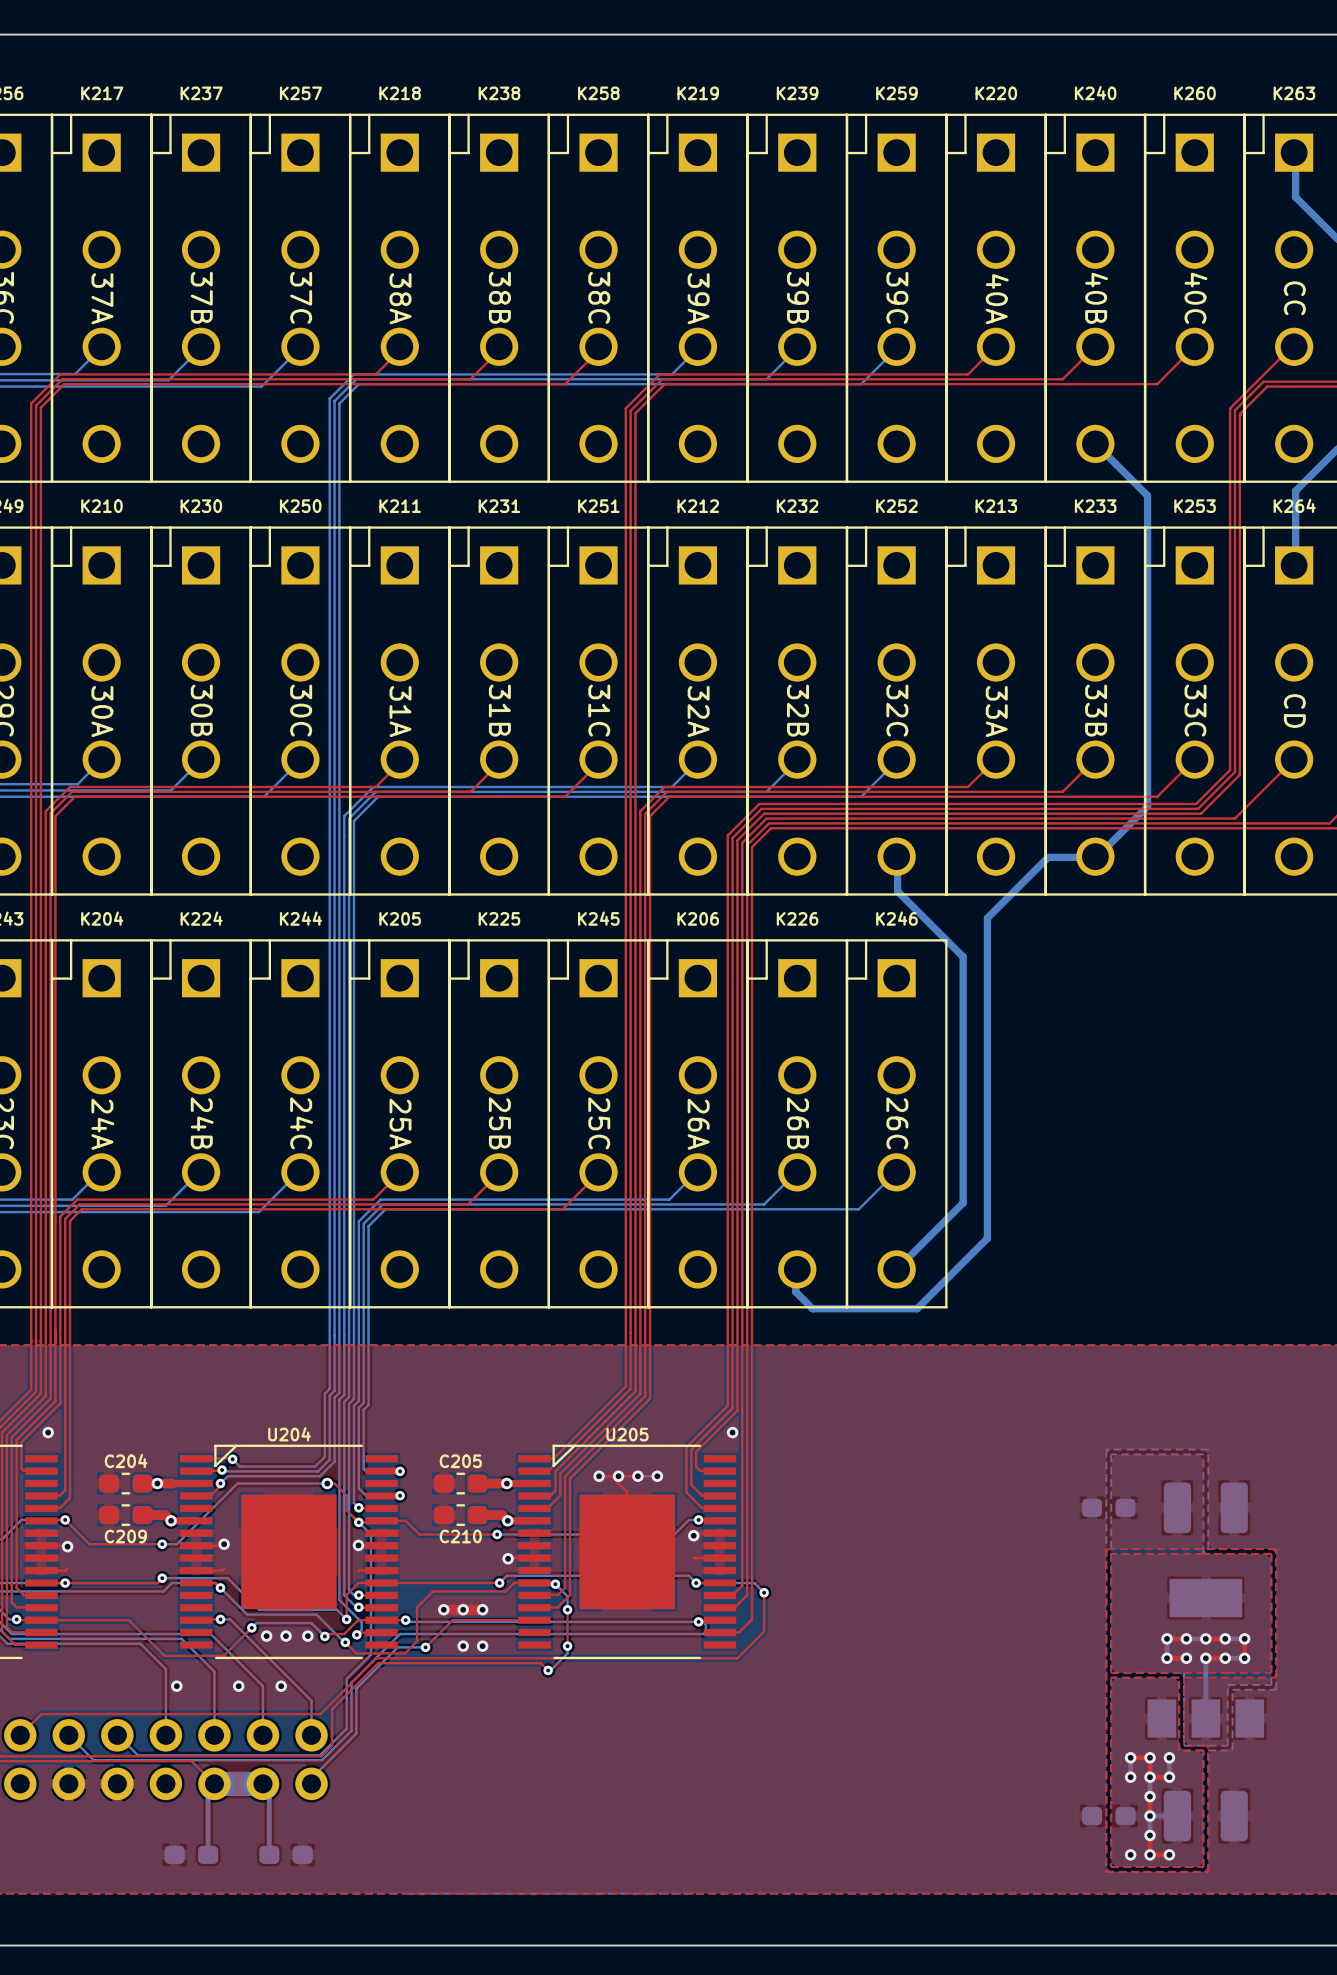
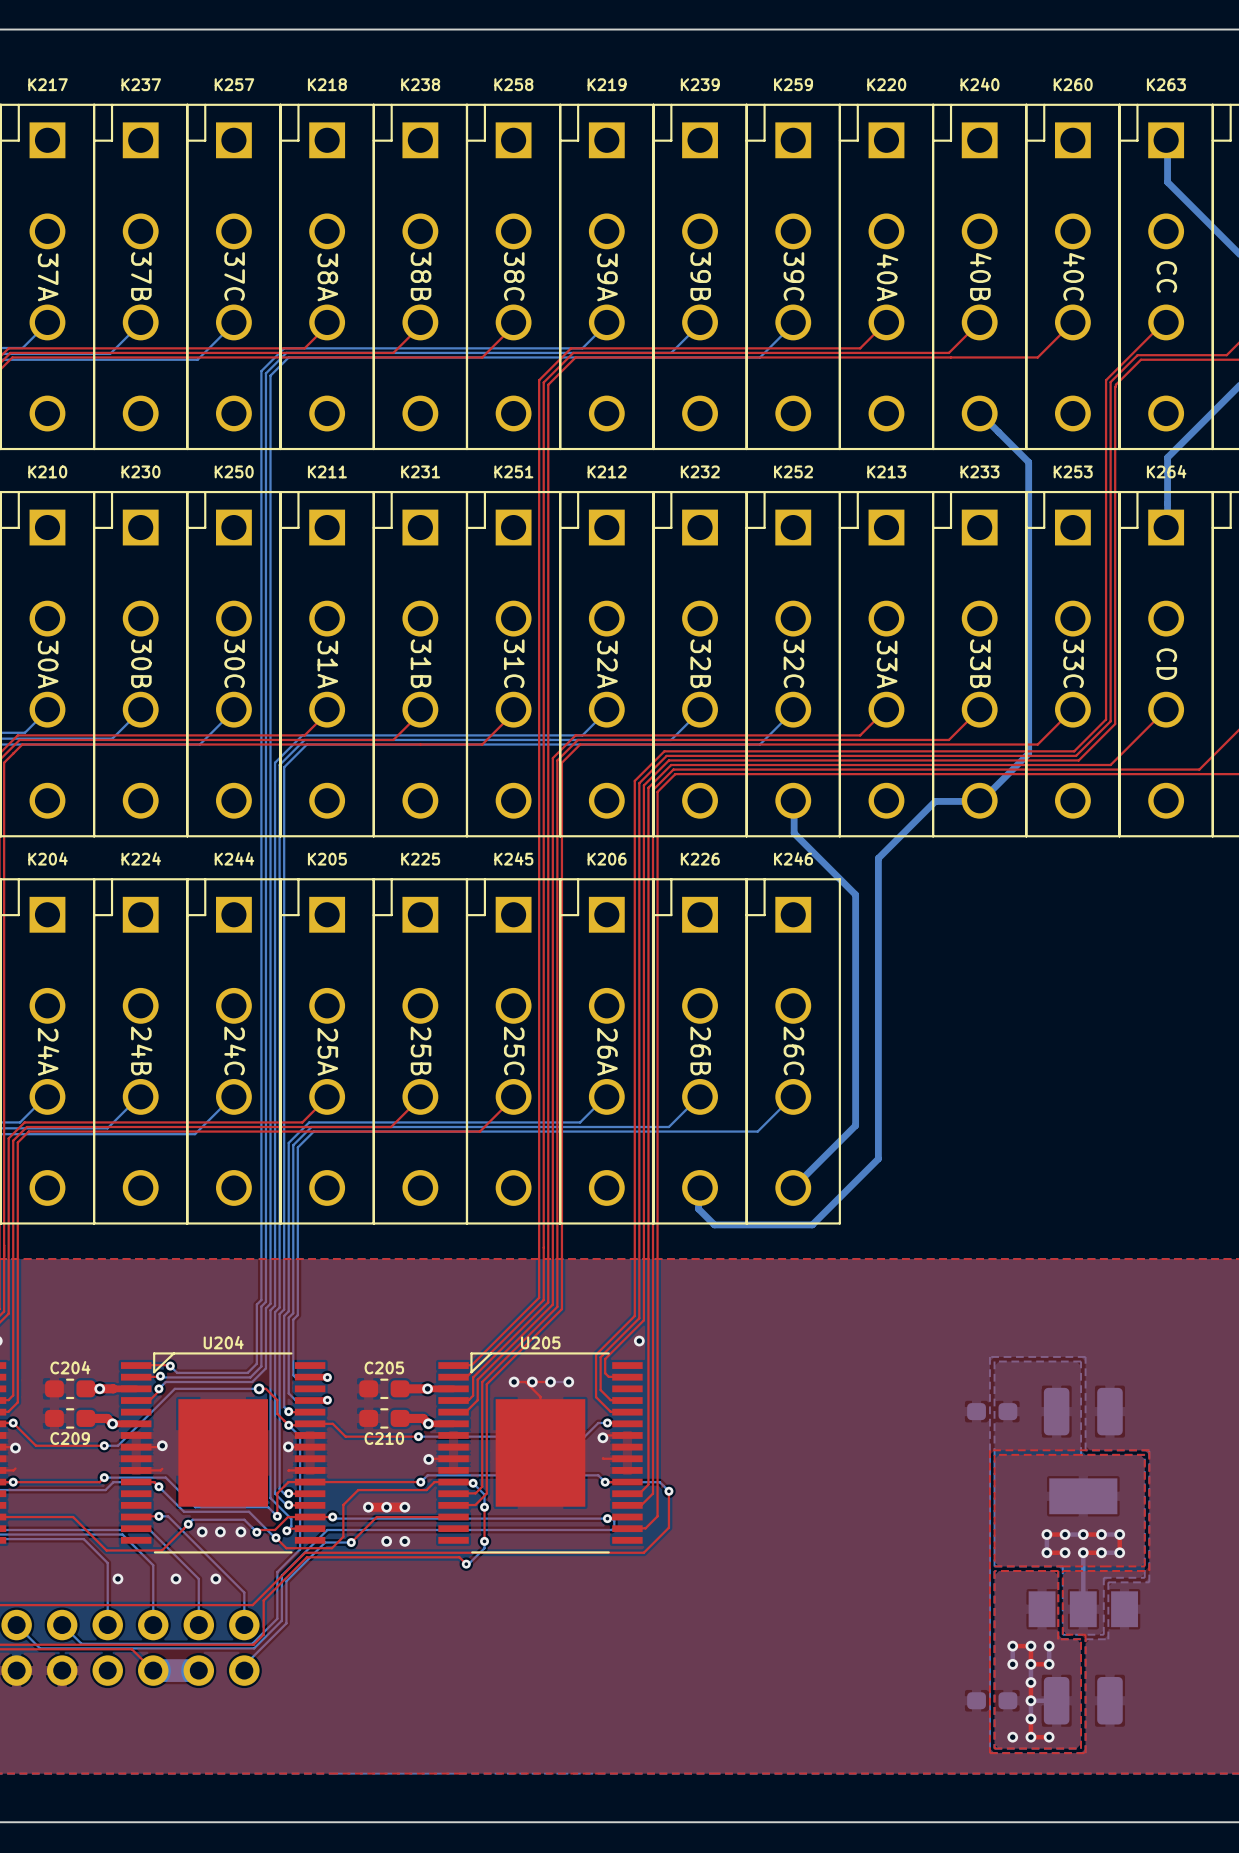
bottom track: (214, 1783) (208, 1790) (208, 1854) -> none
bottom track: (262, 1783) (269, 1790) (269, 1854) -> none
part: (191, 1854) -> none
part: (286, 1854) -> none

